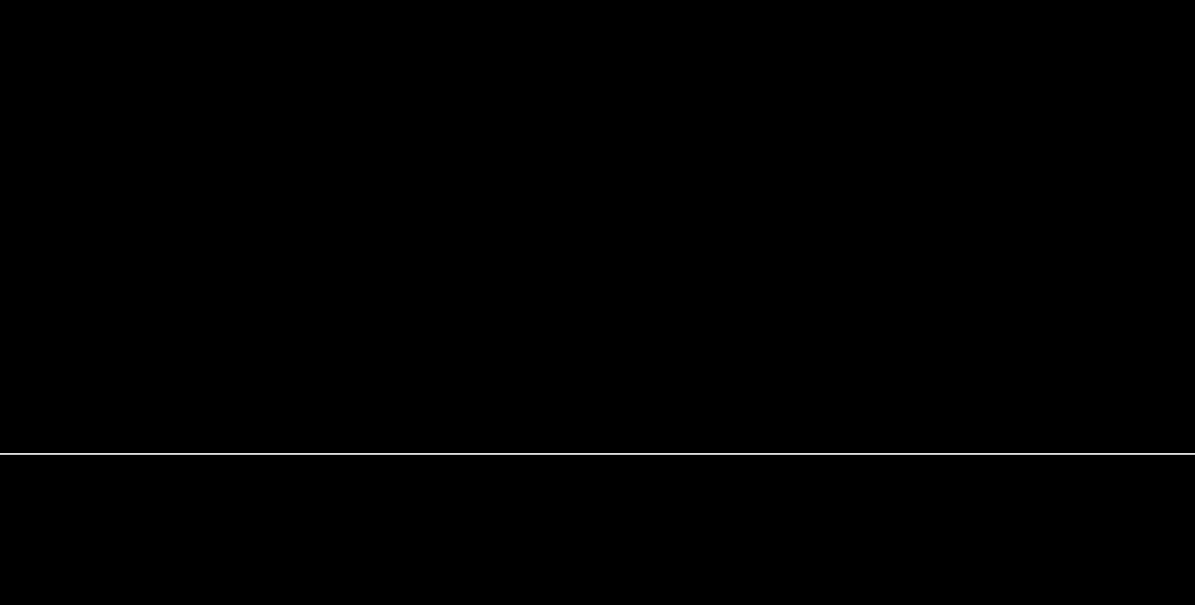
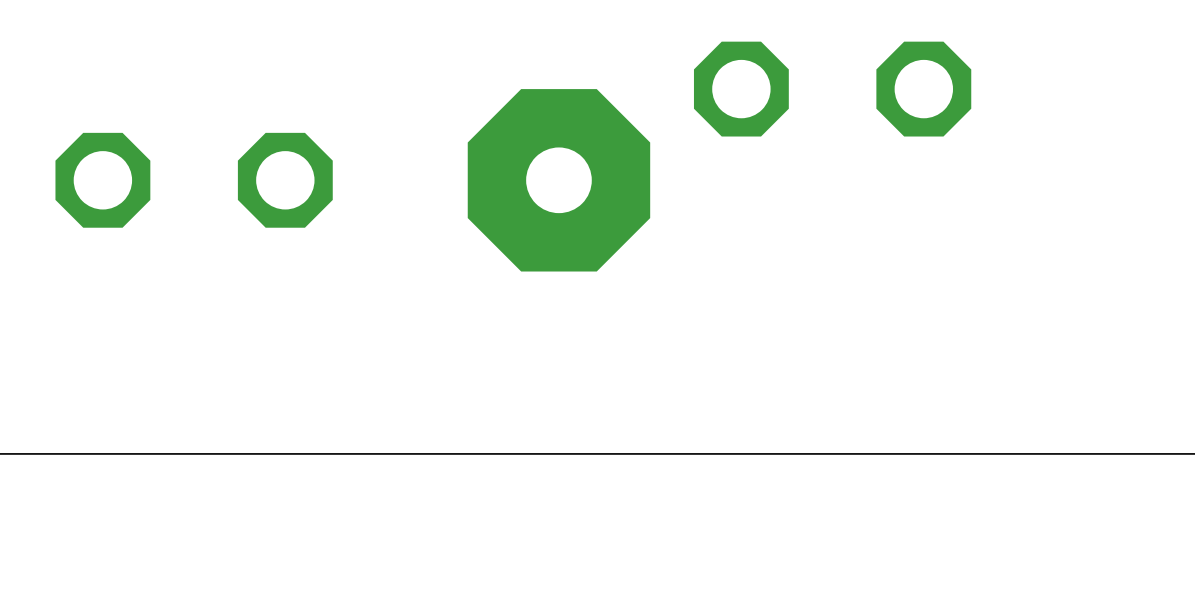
part: none -> (832, 89)
part: none -> (194, 180)
part: none -> (558, 180)

